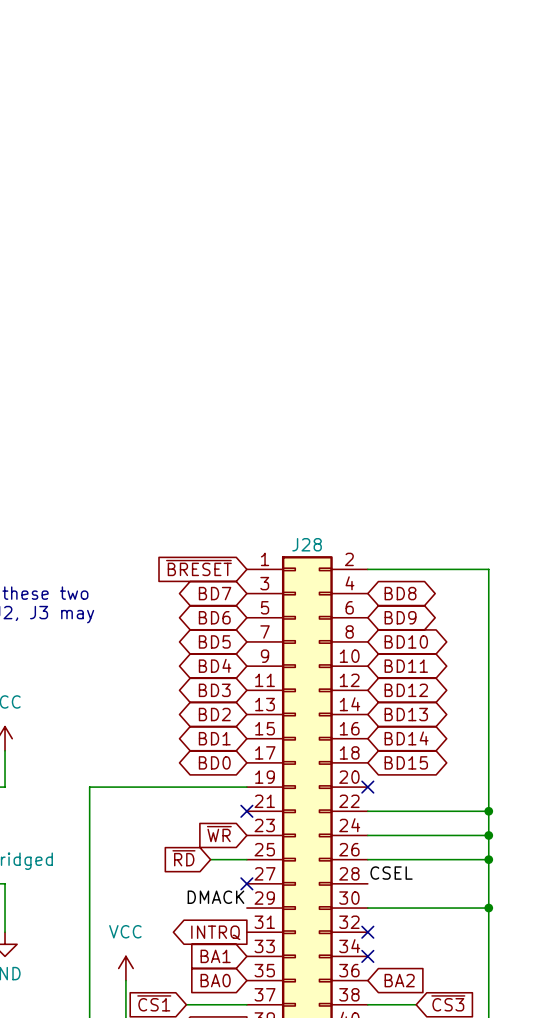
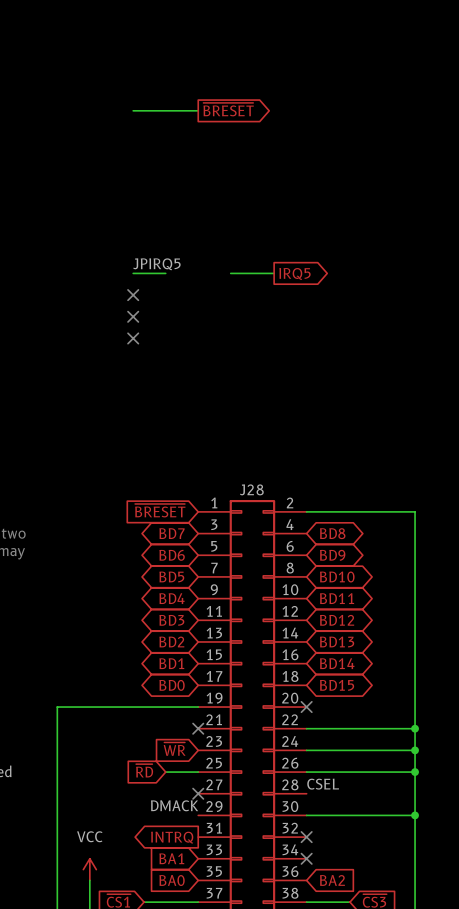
global label: none -> ~{BRESET} (228, 109)
wire: none -> (133, 110) (198, 110)
label: none -> JPIRQ5 (156, 264)
wire: none -> (133, 273) (165, 273)
wire: none -> (230, 273) (274, 273)
global label: none -> IRQ5 (294, 273)
no-connect mark: none -> (133, 295)
no-connect mark: none -> (133, 316)
no-connect mark: none -> (133, 338)

